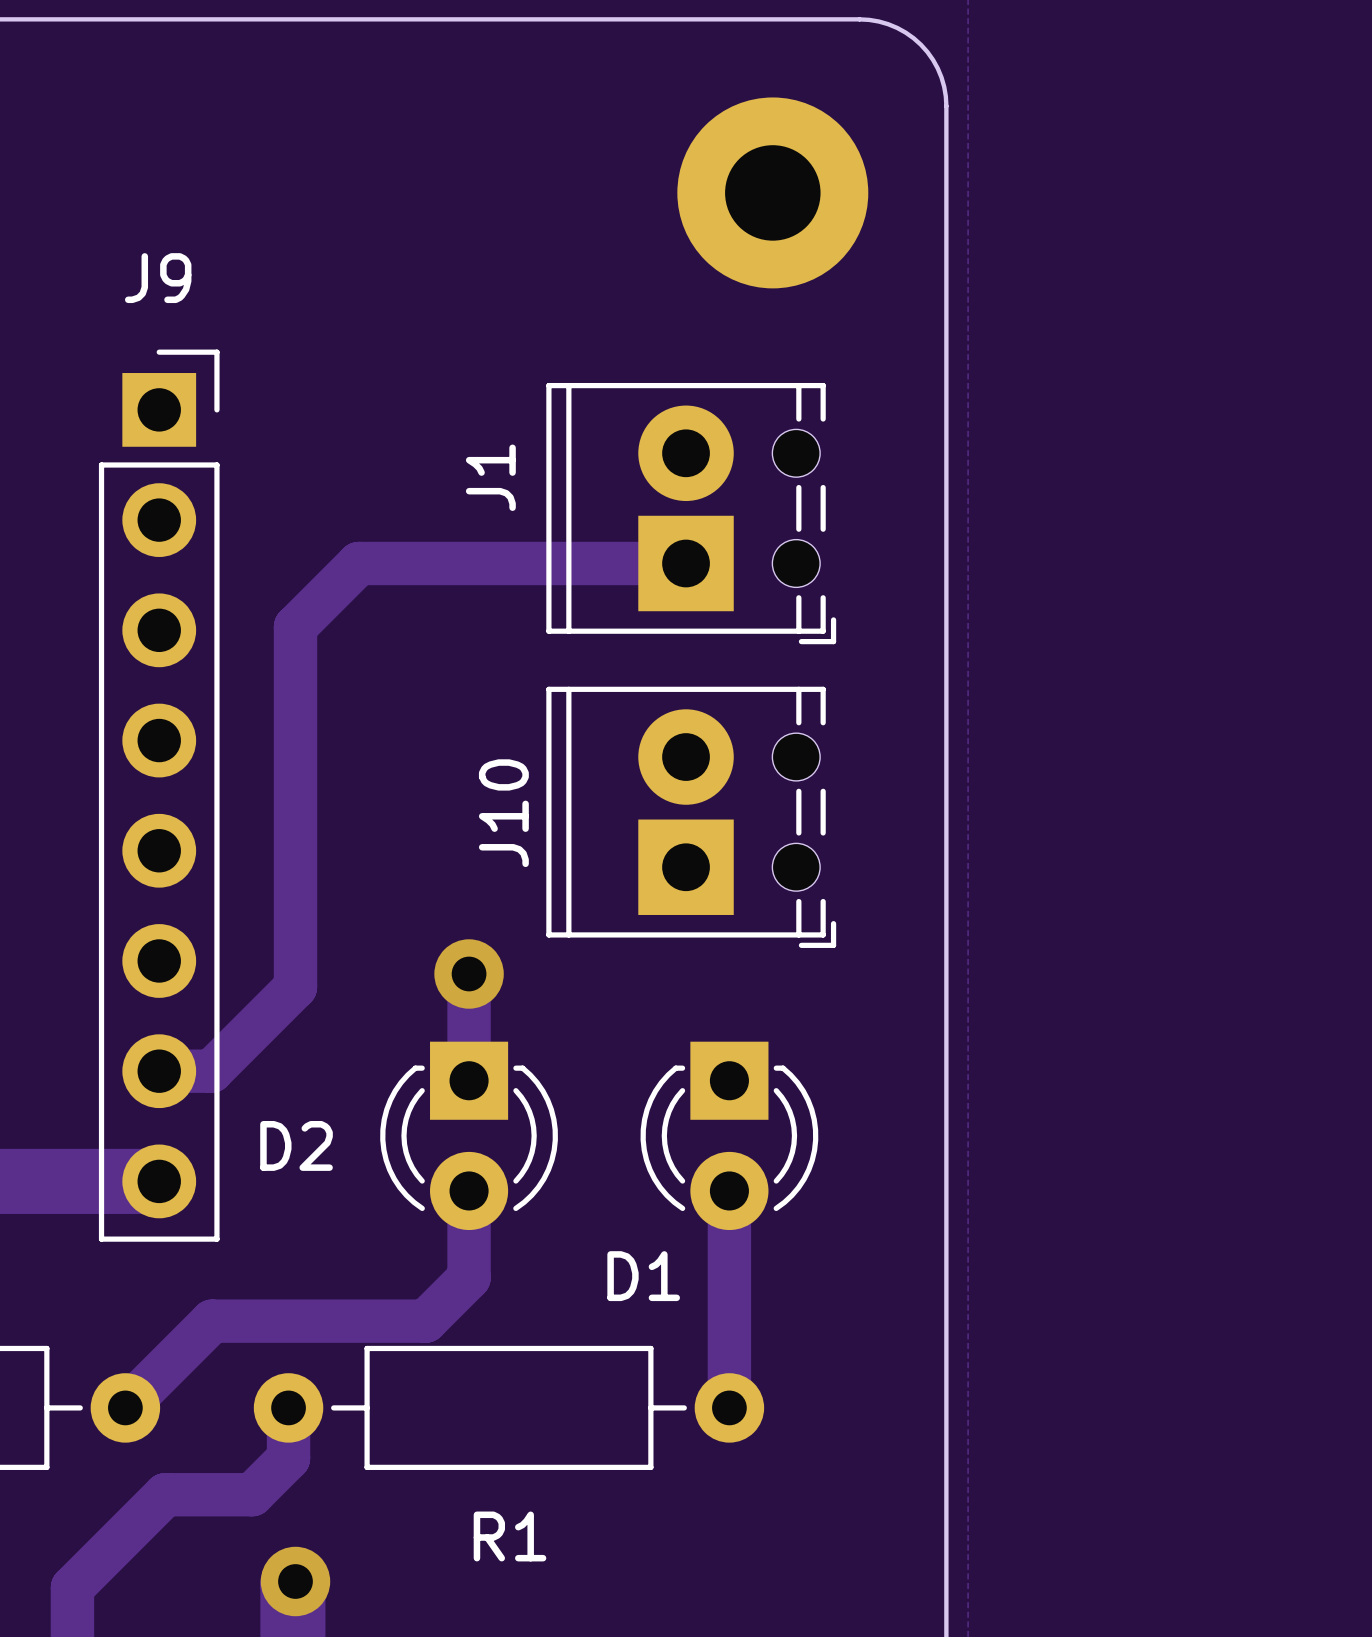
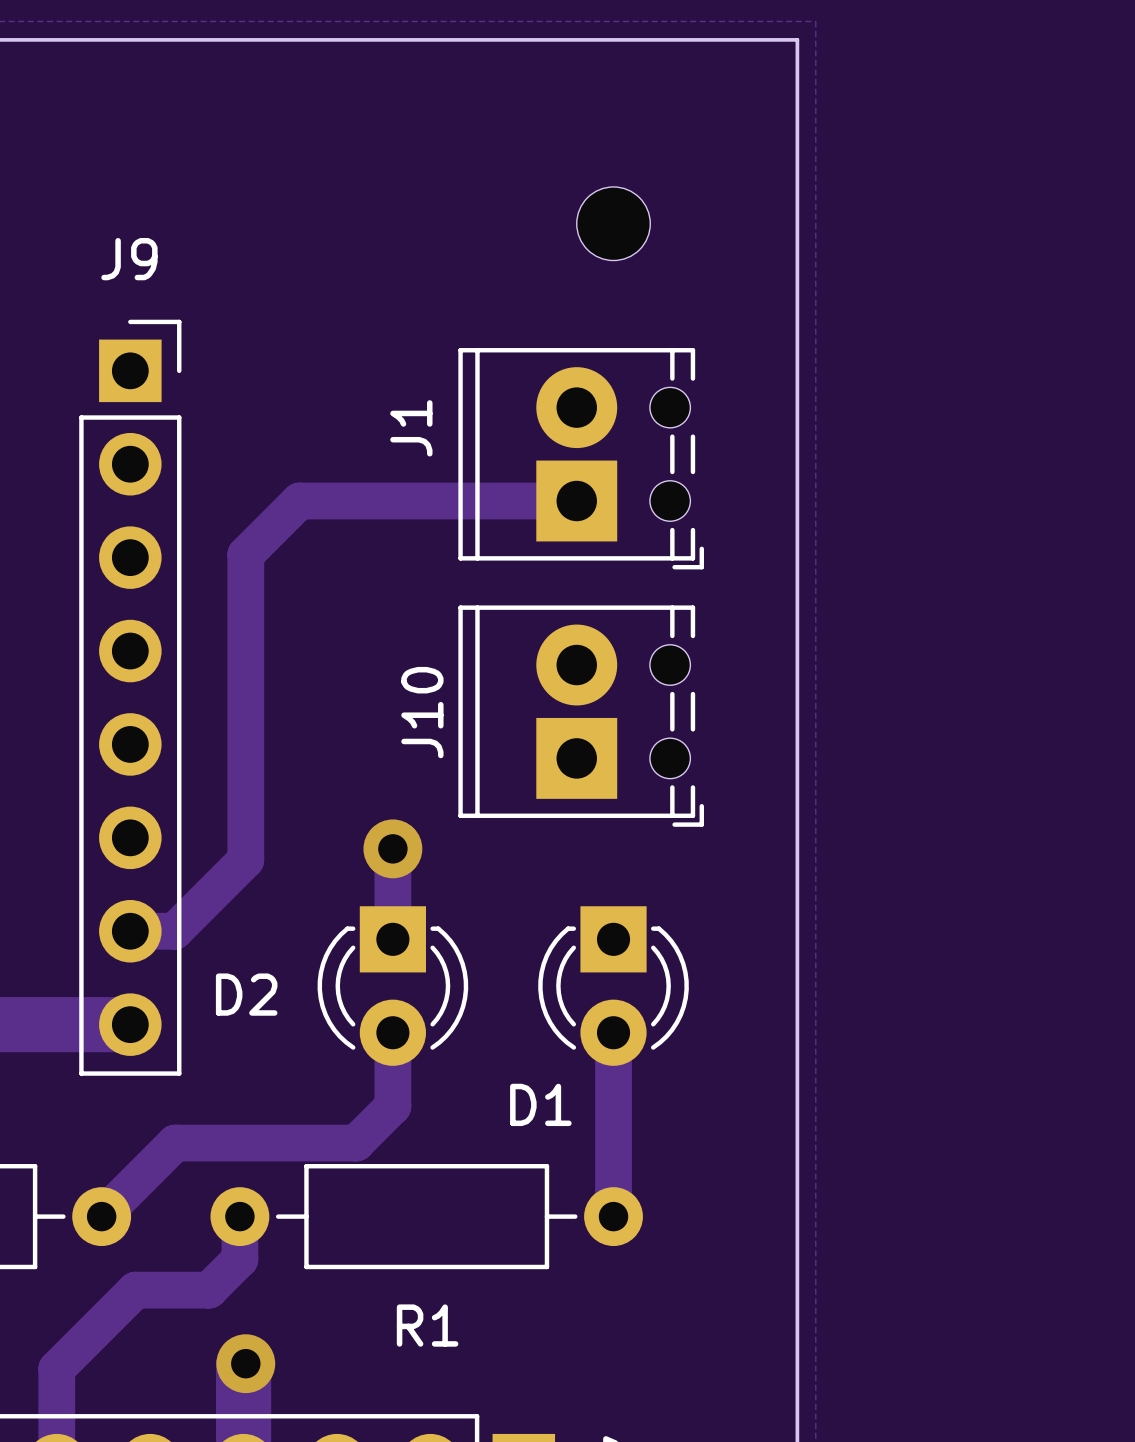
board edge: (859, 19) (888, 24) (905, 32) (920, 44) (937, 68) (944, 86) (946, 106) -> (723, 39) (797, 39) (797, 113)
part: (772, 192) -> none
part: none -> (613, 223)

